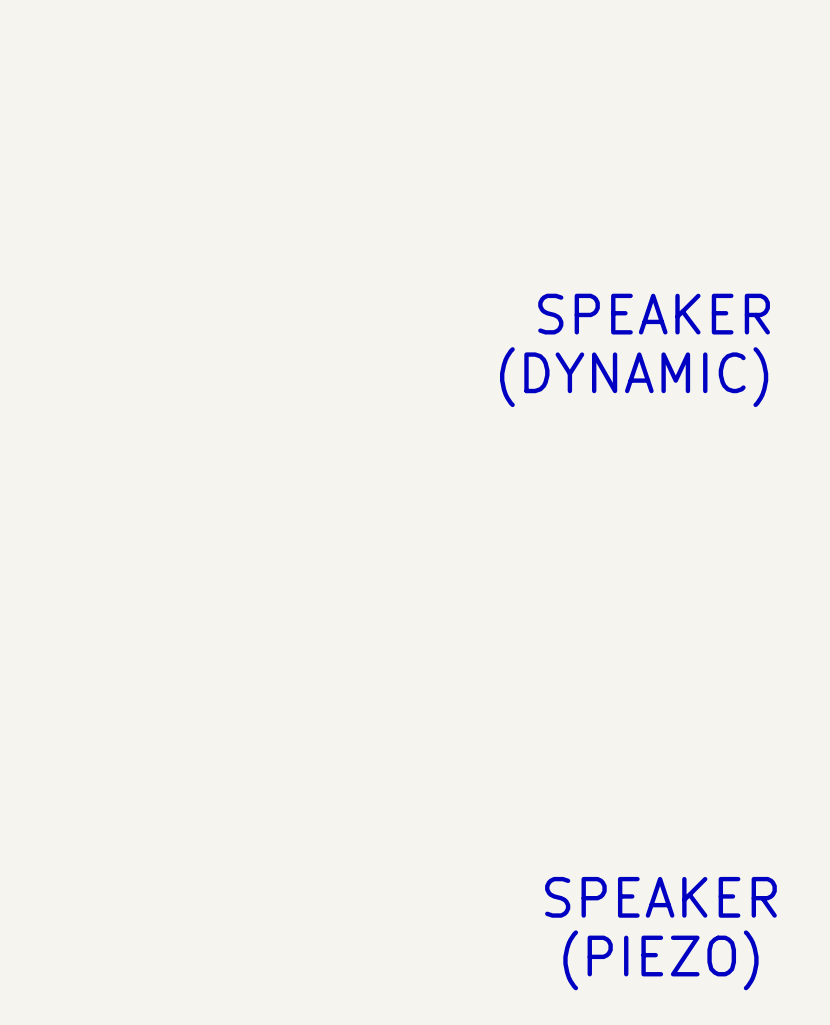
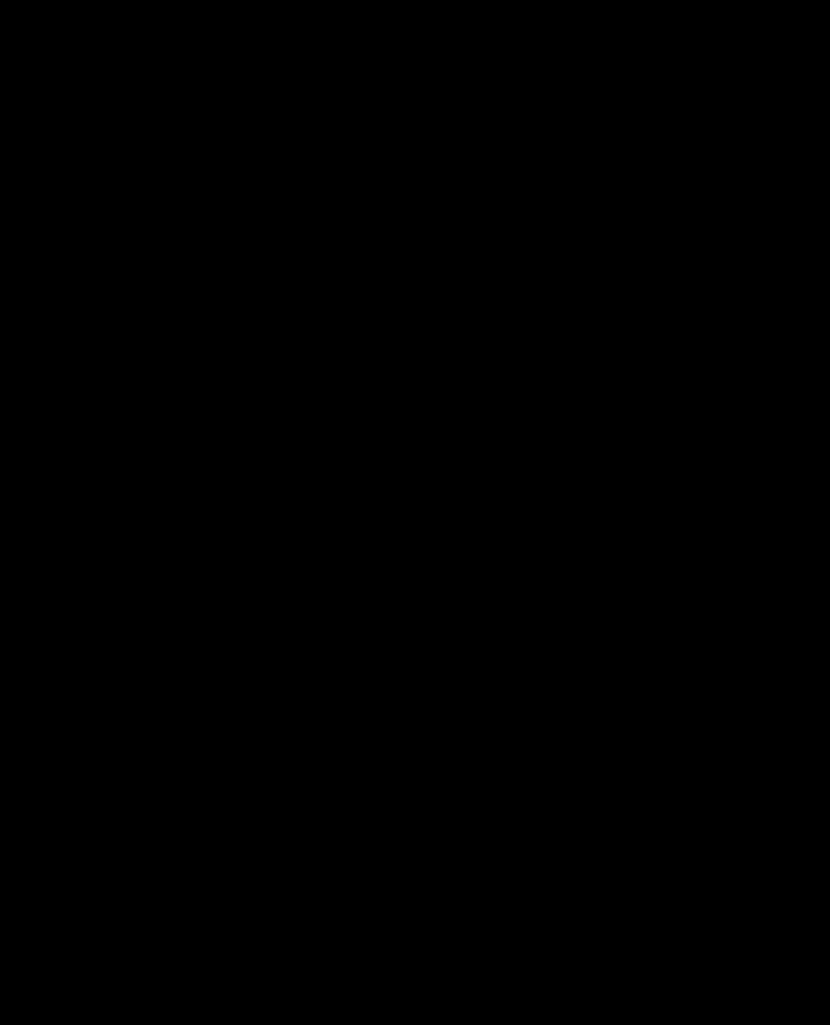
text: SPEAKER (654, 314) -> none
text: (DYNAMIC) (634, 377) -> none
text: SPEAKER (660, 897) -> none
text: (PIEZO) (660, 960) -> none

